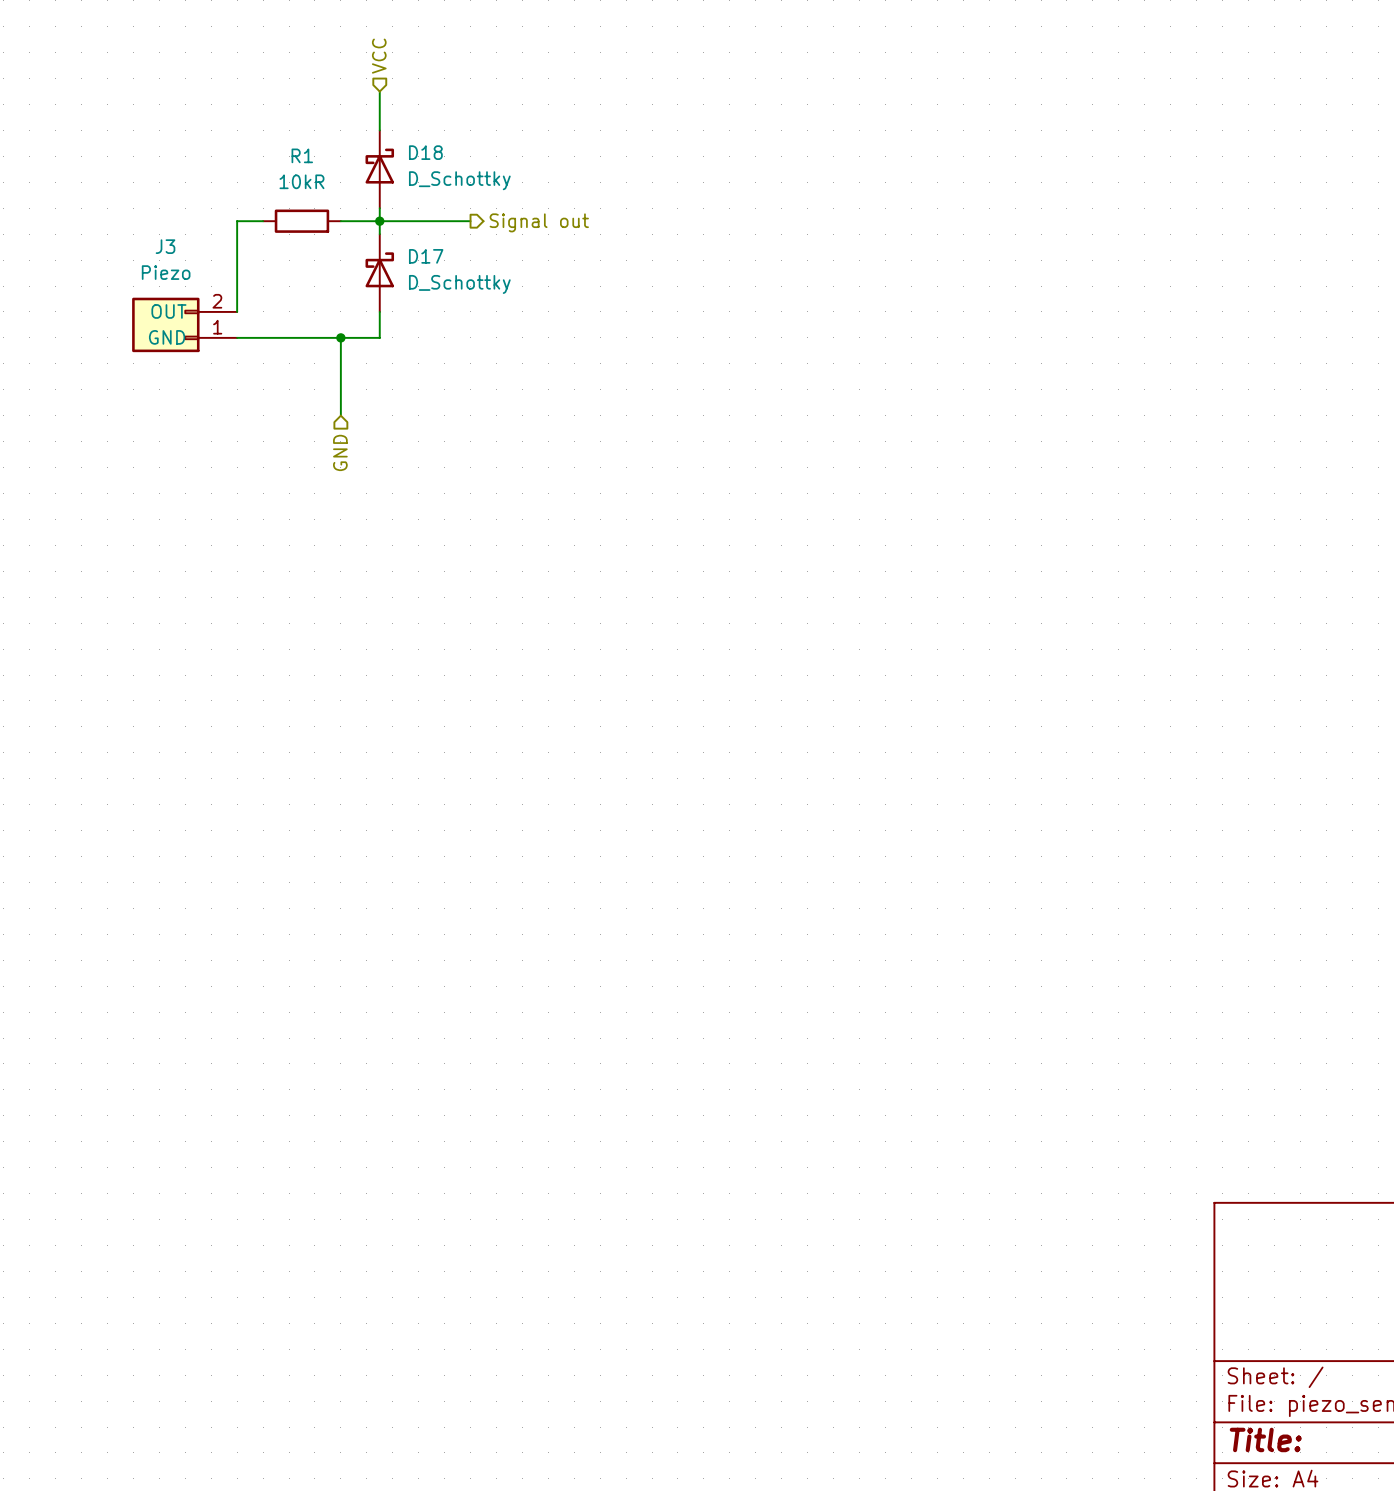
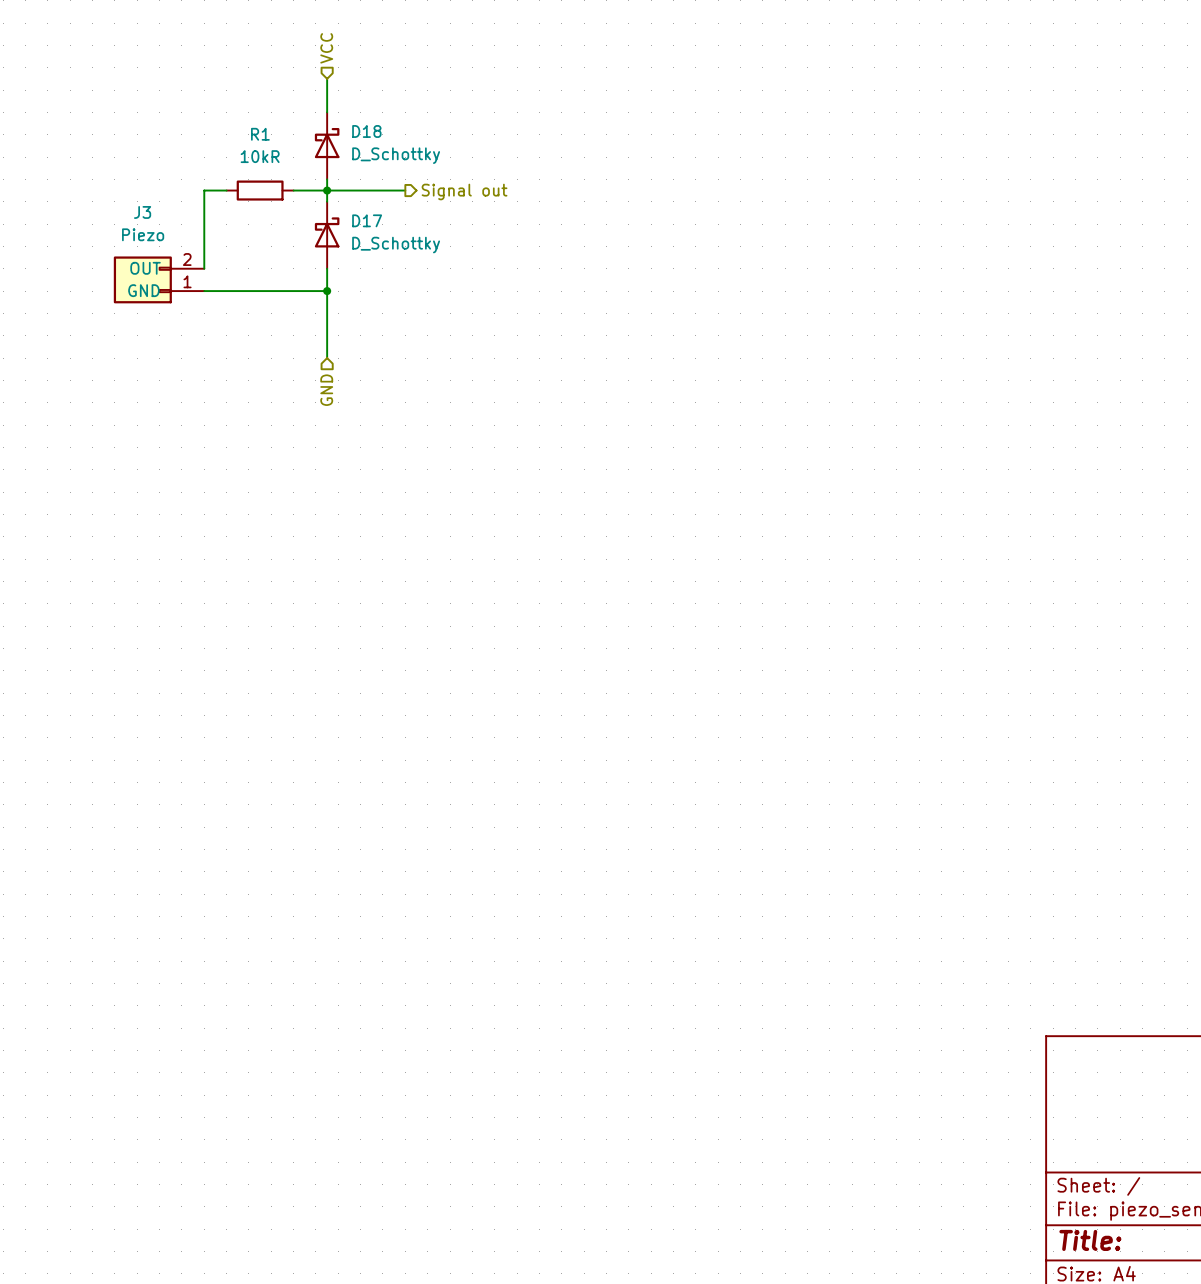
wire: (340, 337) (340, 415) -> (327, 291) (327, 358)
junction position: (340, 337) -> (327, 291)
hierarchical label position: GND (340, 452) -> GND (326, 390)

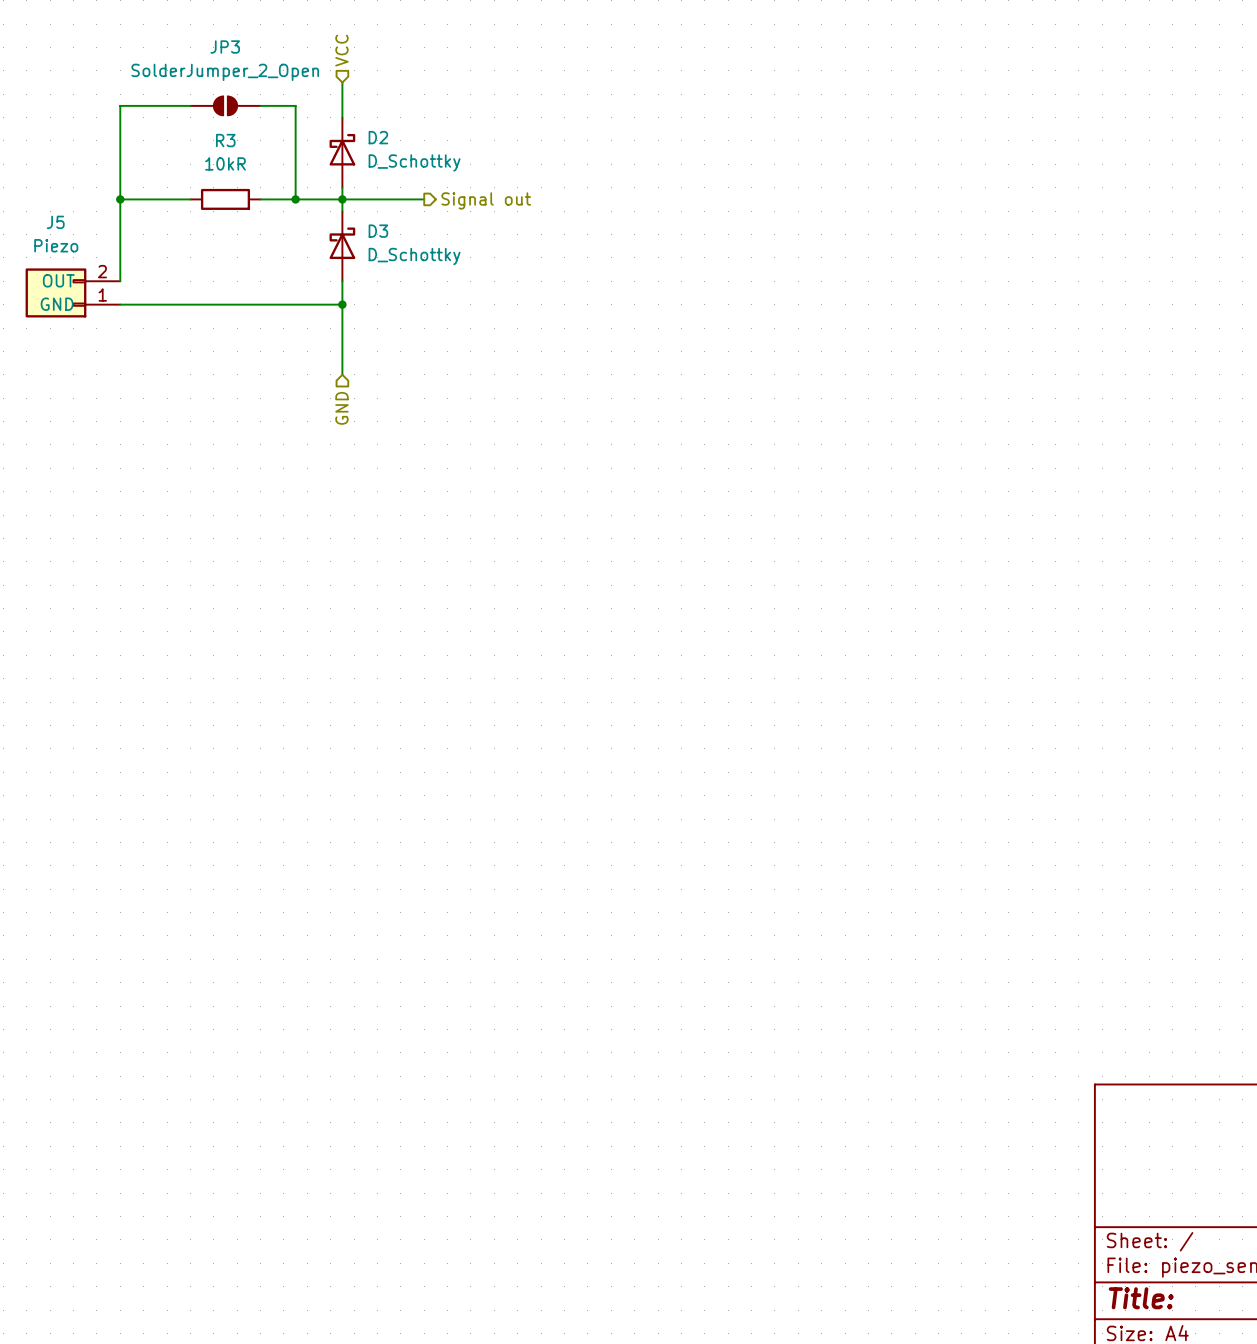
wire: none -> (190, 105) (120, 105) (120, 281)
JP3: none -> SolderJumper_2_Open (225, 105)
wire: none -> (260, 105) (295, 105) (295, 199)
D18 name: D18 (366, 131) -> D2 (378, 137)
wire: none -> (120, 199) (190, 199)
junction: none -> (120, 199)
R3: none -> 10kR (225, 199)
wire: (226, 190) (204, 190) (204, 268) -> none
wire: none -> (260, 199) (307, 199)
R1: 10kR (260, 190) -> none
junction: none -> (295, 199)
D17 name: D17 (367, 220) -> D3 (378, 231)
J5: none -> Piezo (72, 292)
J3: Piezo (159, 279) -> none

